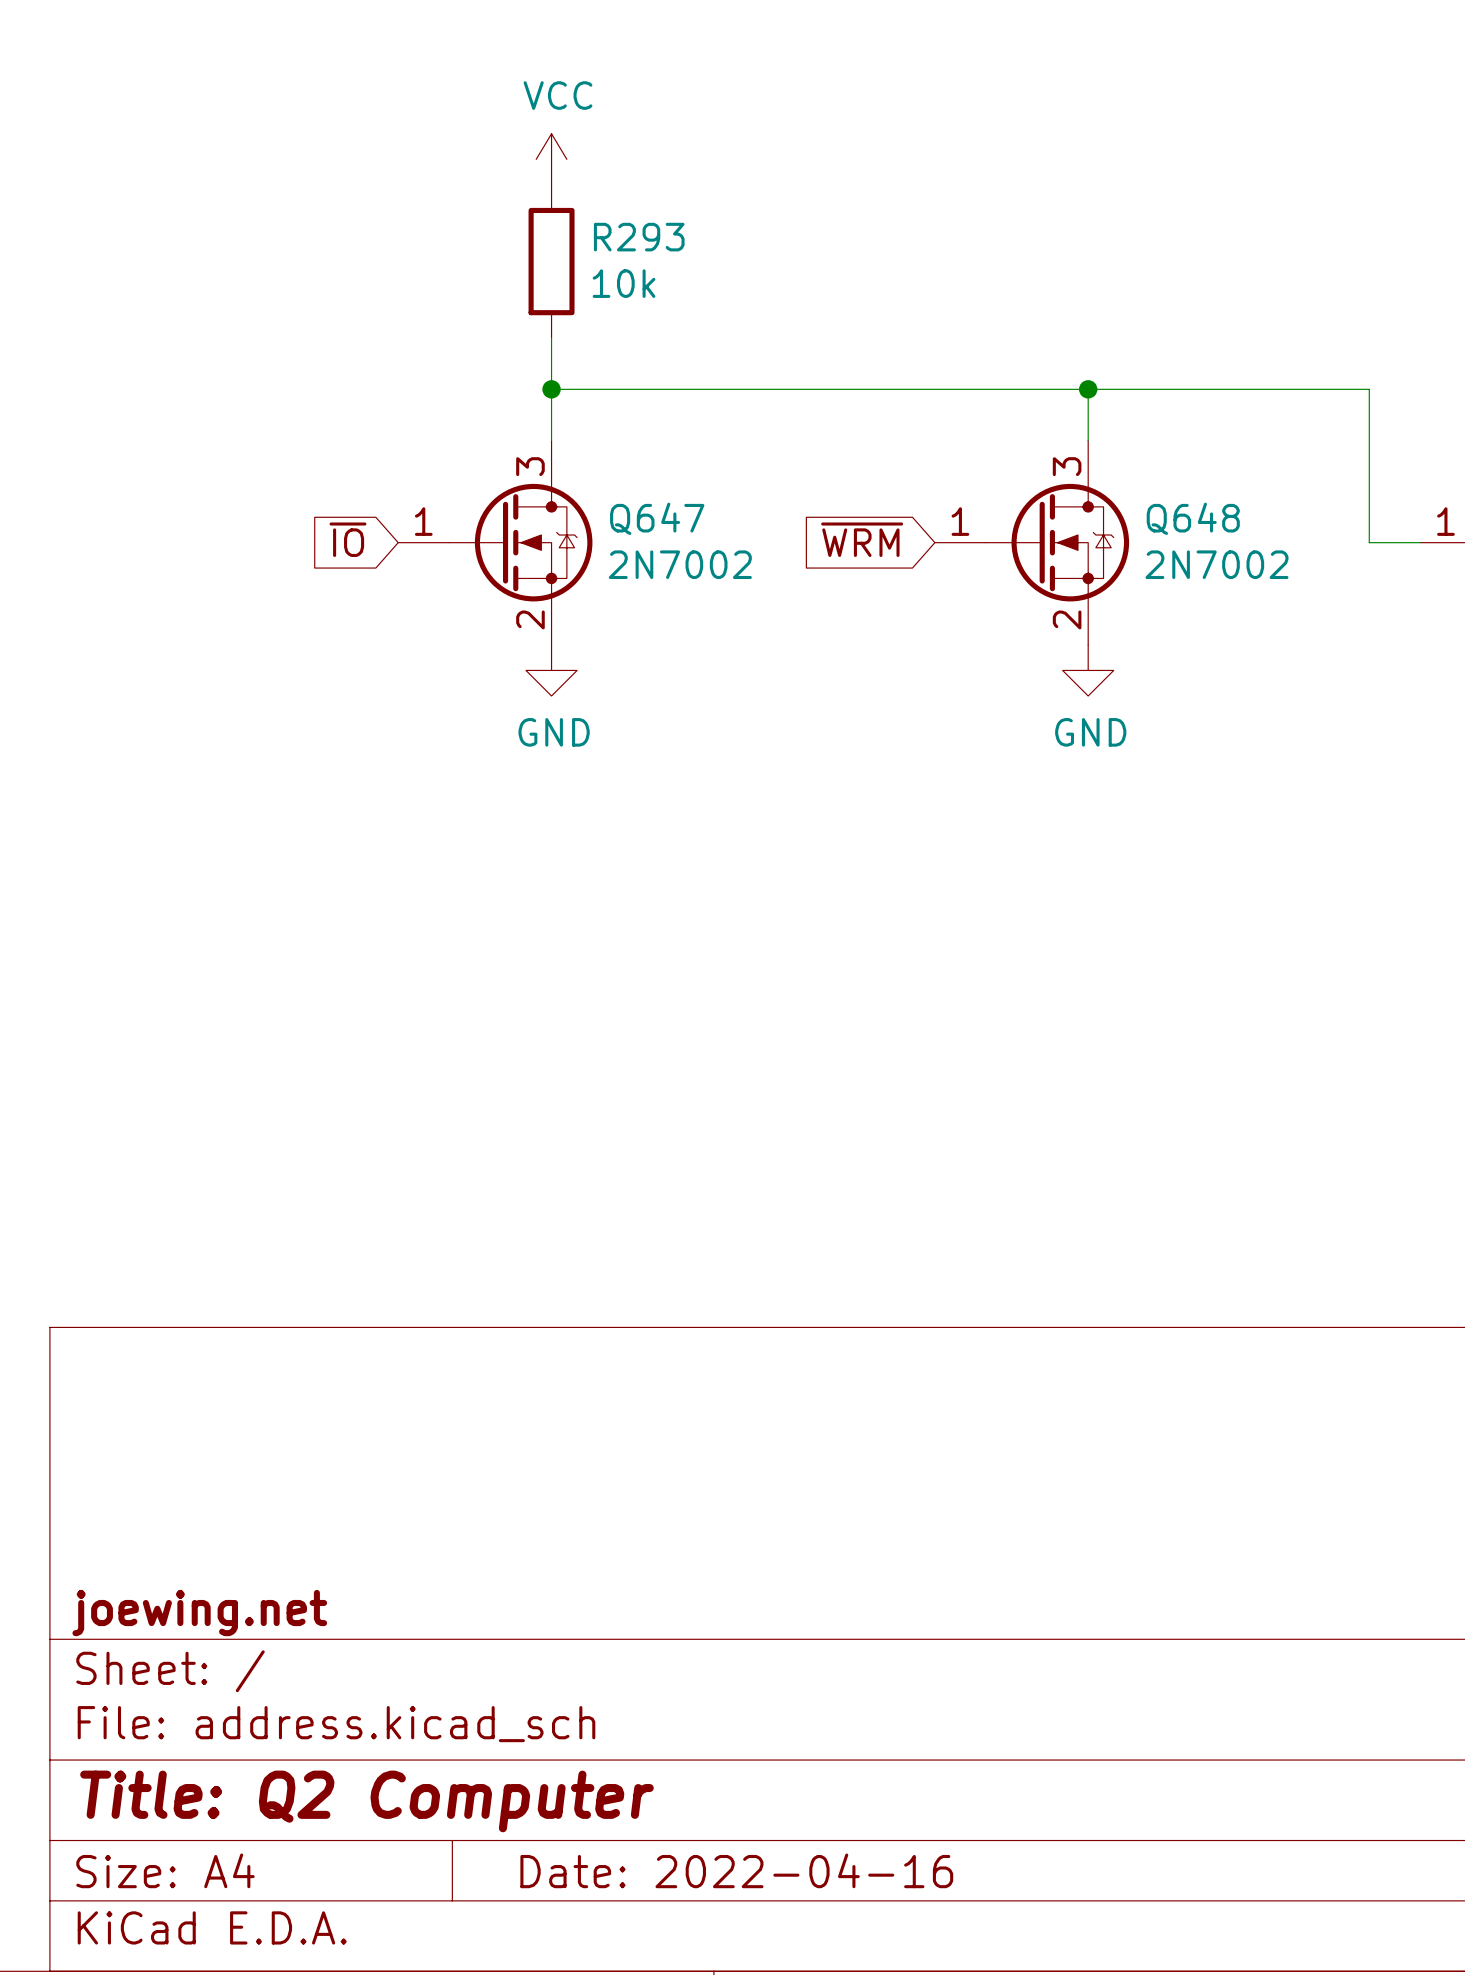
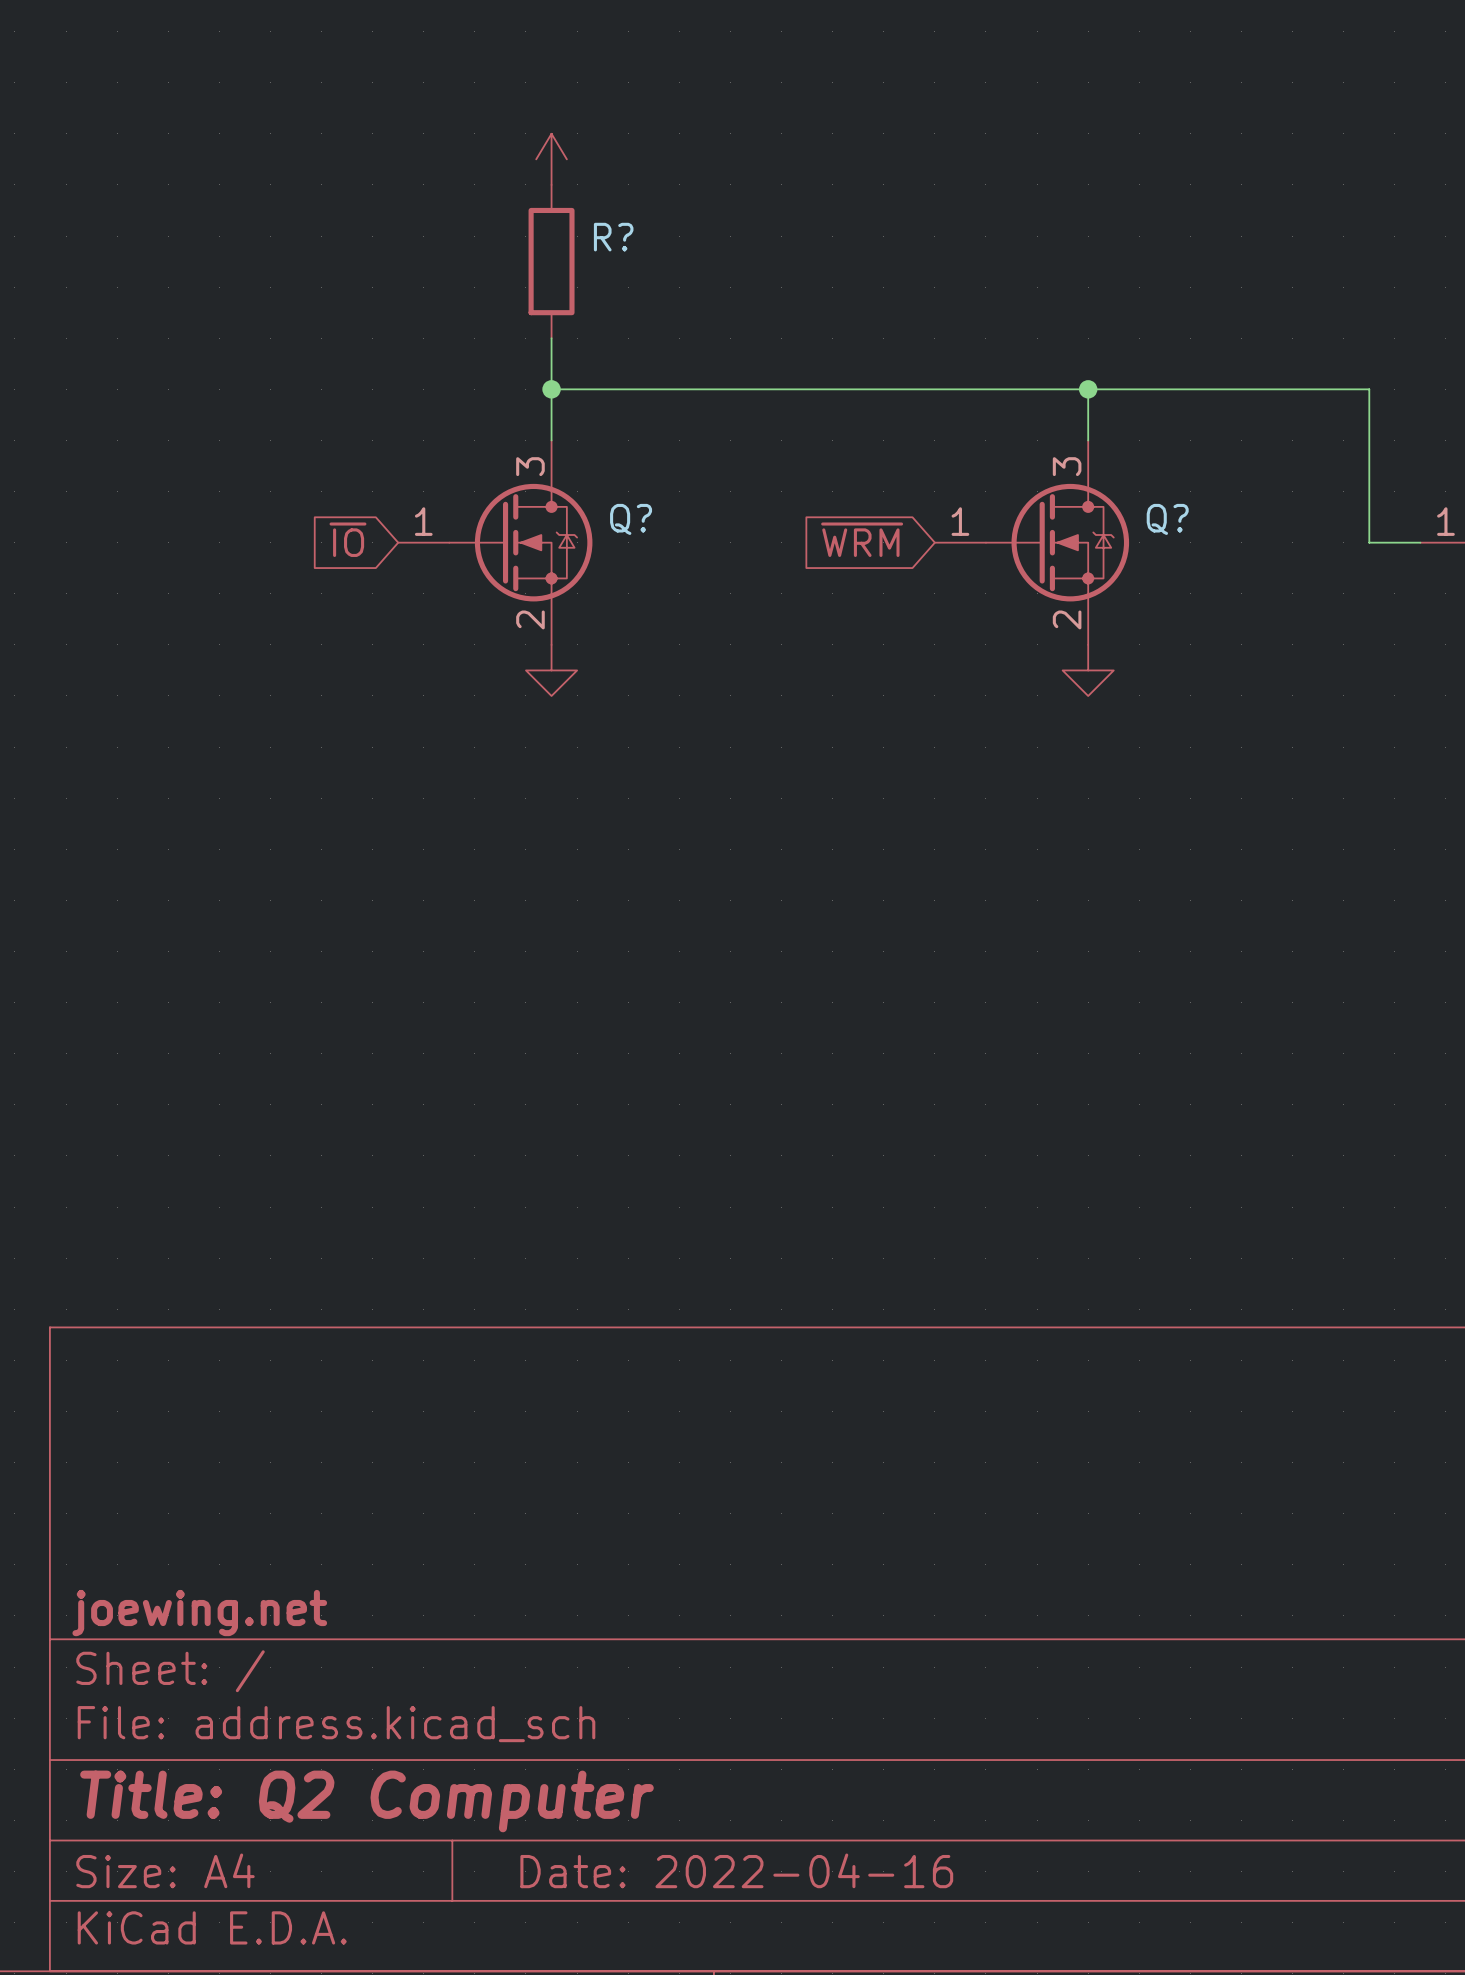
power symbol text: VCC (558, 95) -> none
R293 name: R293 (639, 237) -> R? (613, 237)
R293 value: 10k (624, 283) -> none
Q647 name: Q647 (657, 518) -> Q? (631, 519)
Q648 name: Q648 (1193, 518) -> Q? (1167, 519)
Q647 value: 2N7002 (680, 564) -> none
Q648 value: 2N7002 (1216, 564) -> none
power symbol text: GND (554, 732) -> none
power symbol text: GND (1090, 732) -> none

